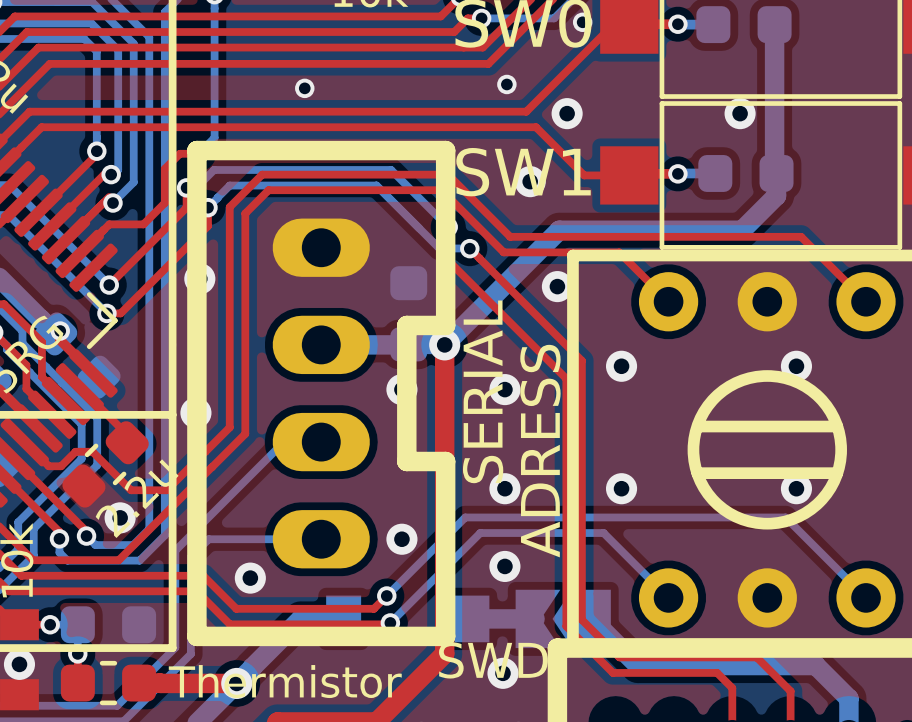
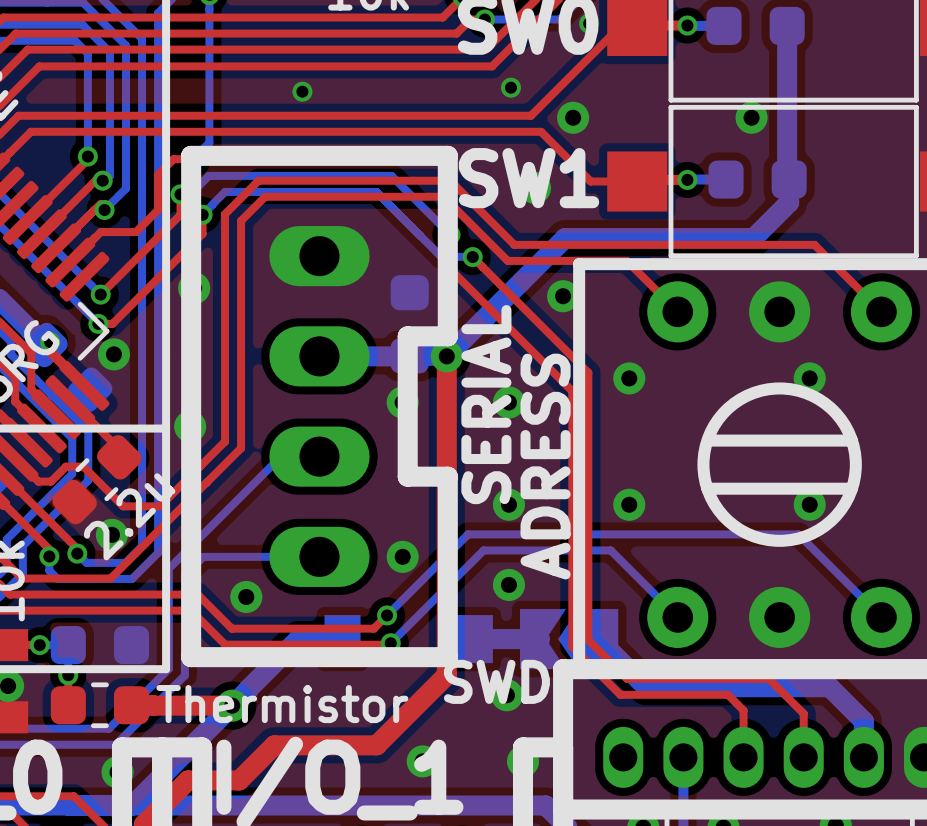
via: none -> (113, 354)

